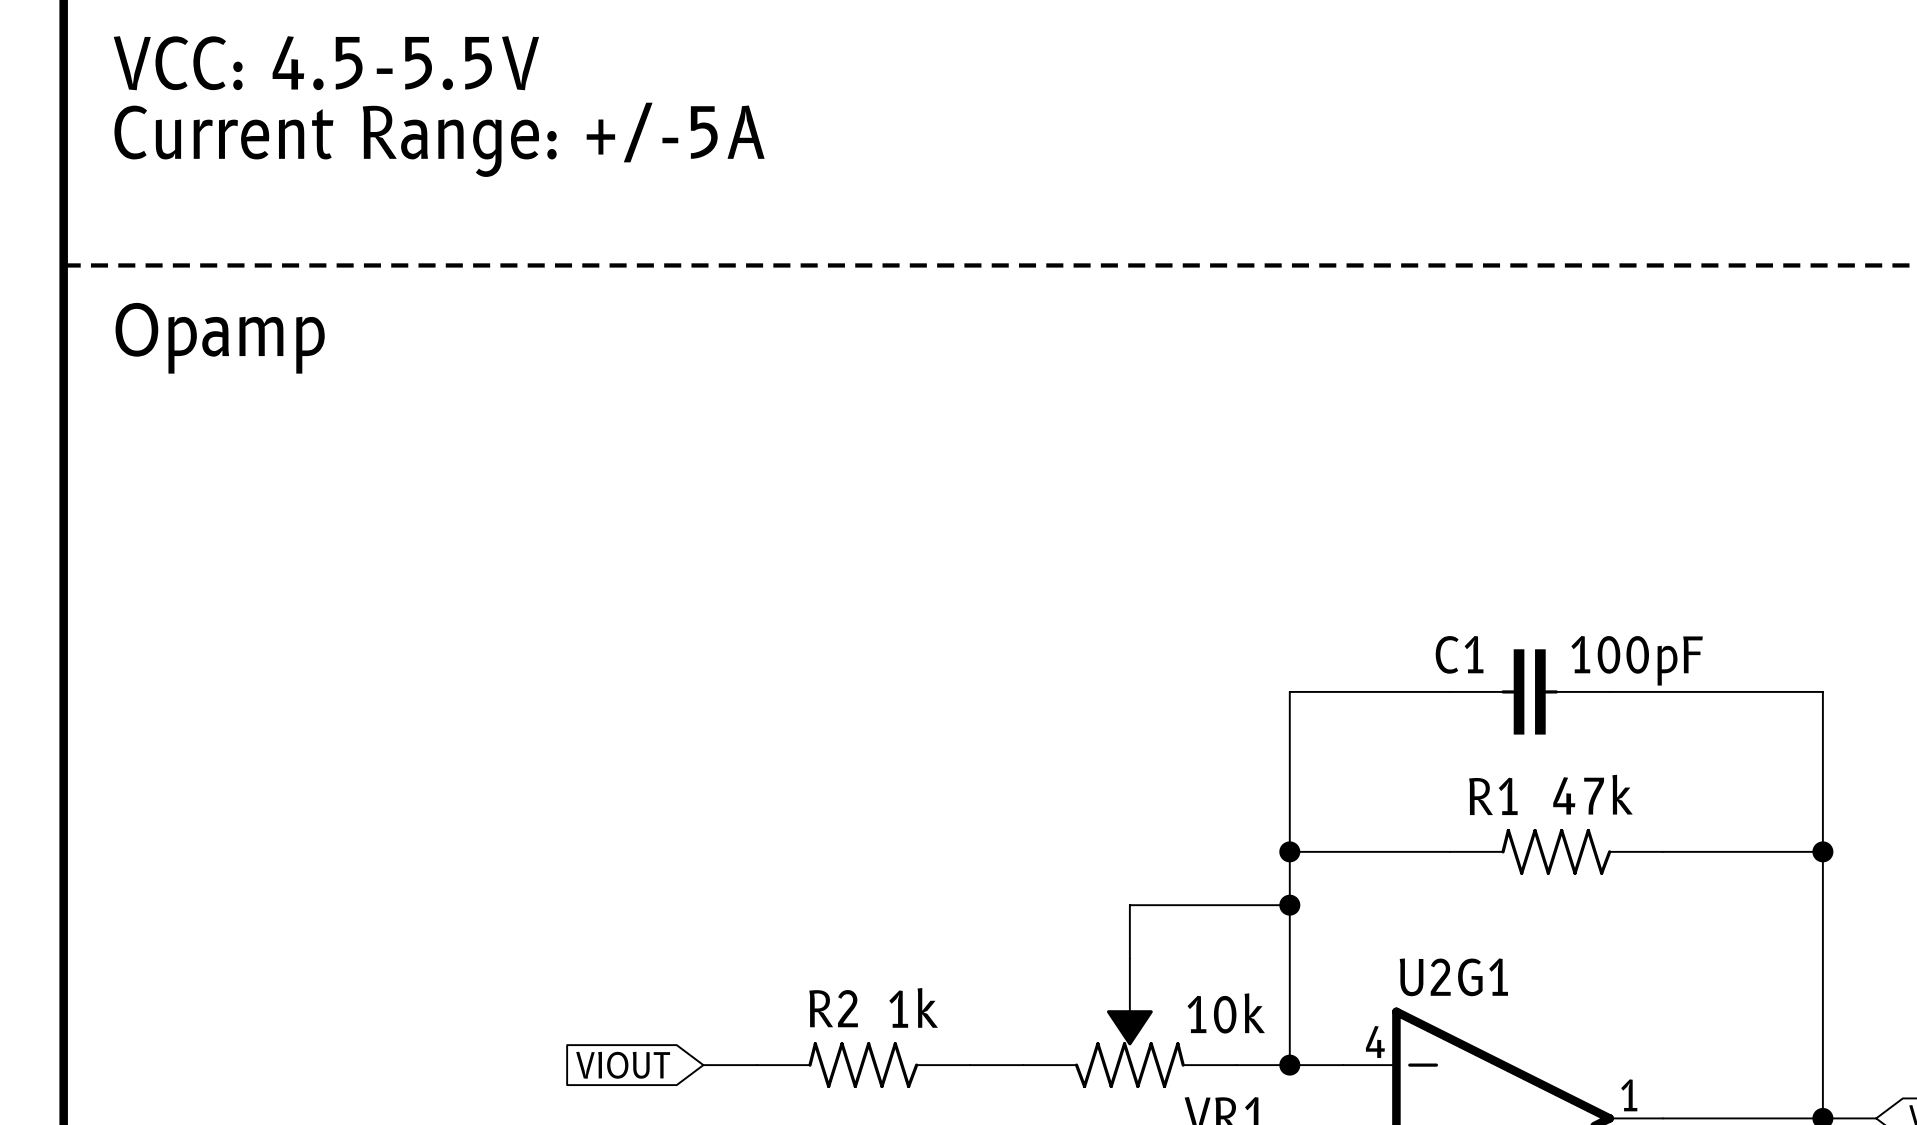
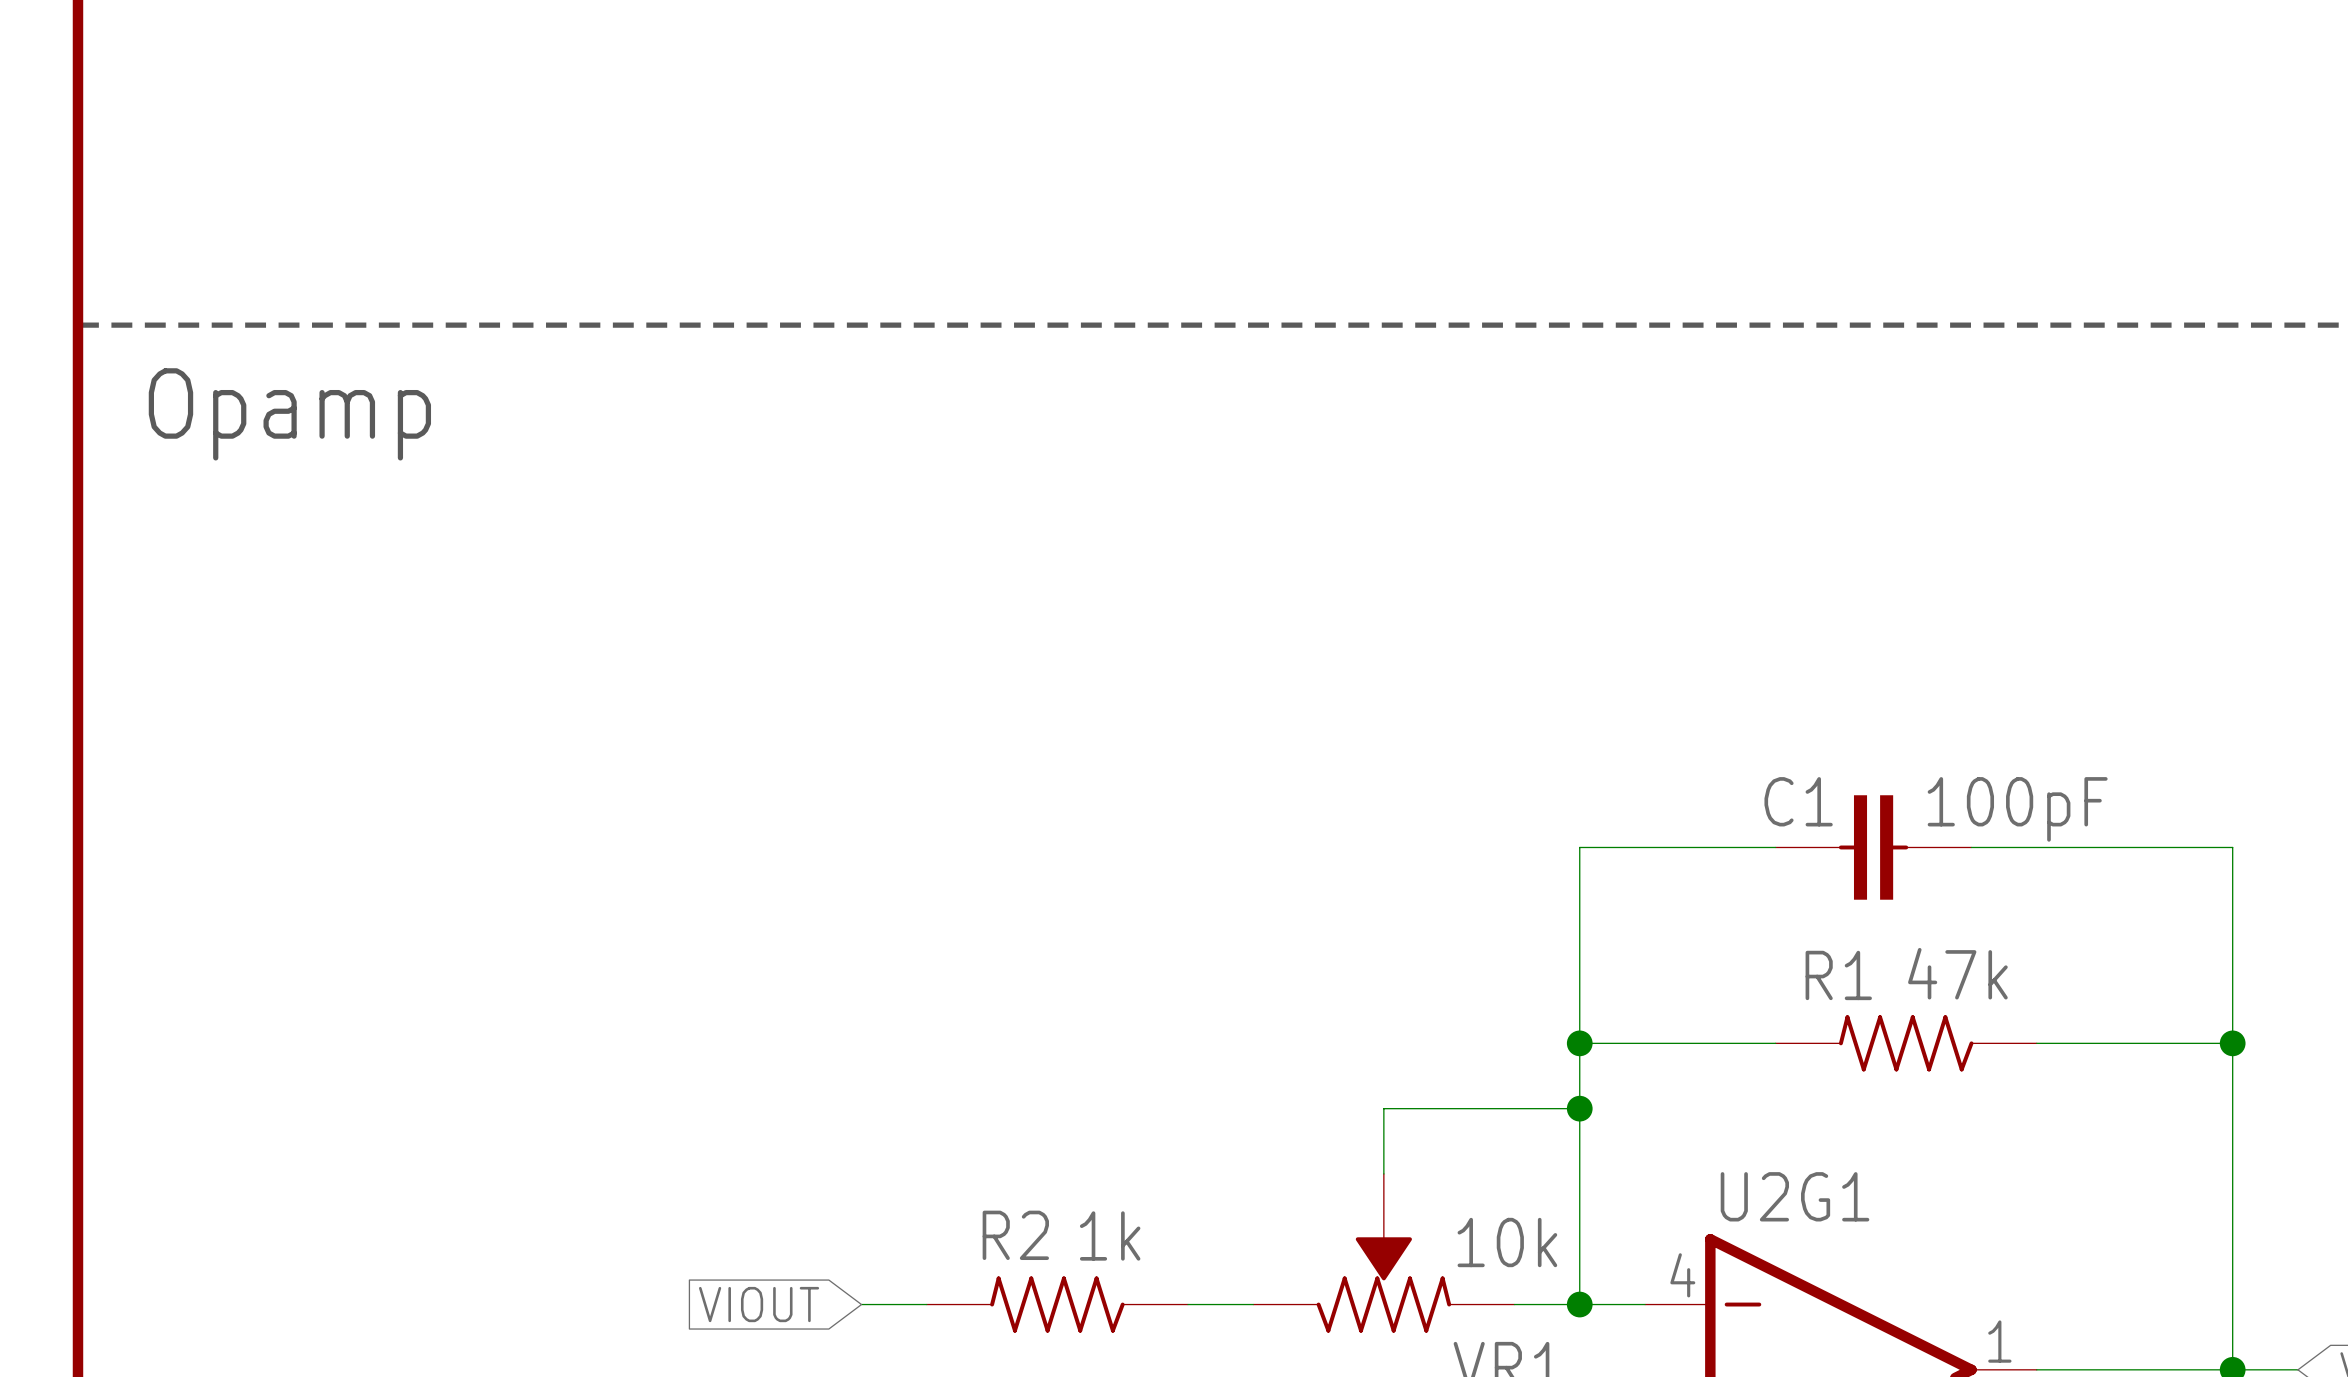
text: VCC: 4.5-5.5V (326, 63) -> none
text: Current Range: +/-5A (439, 139) -> none

